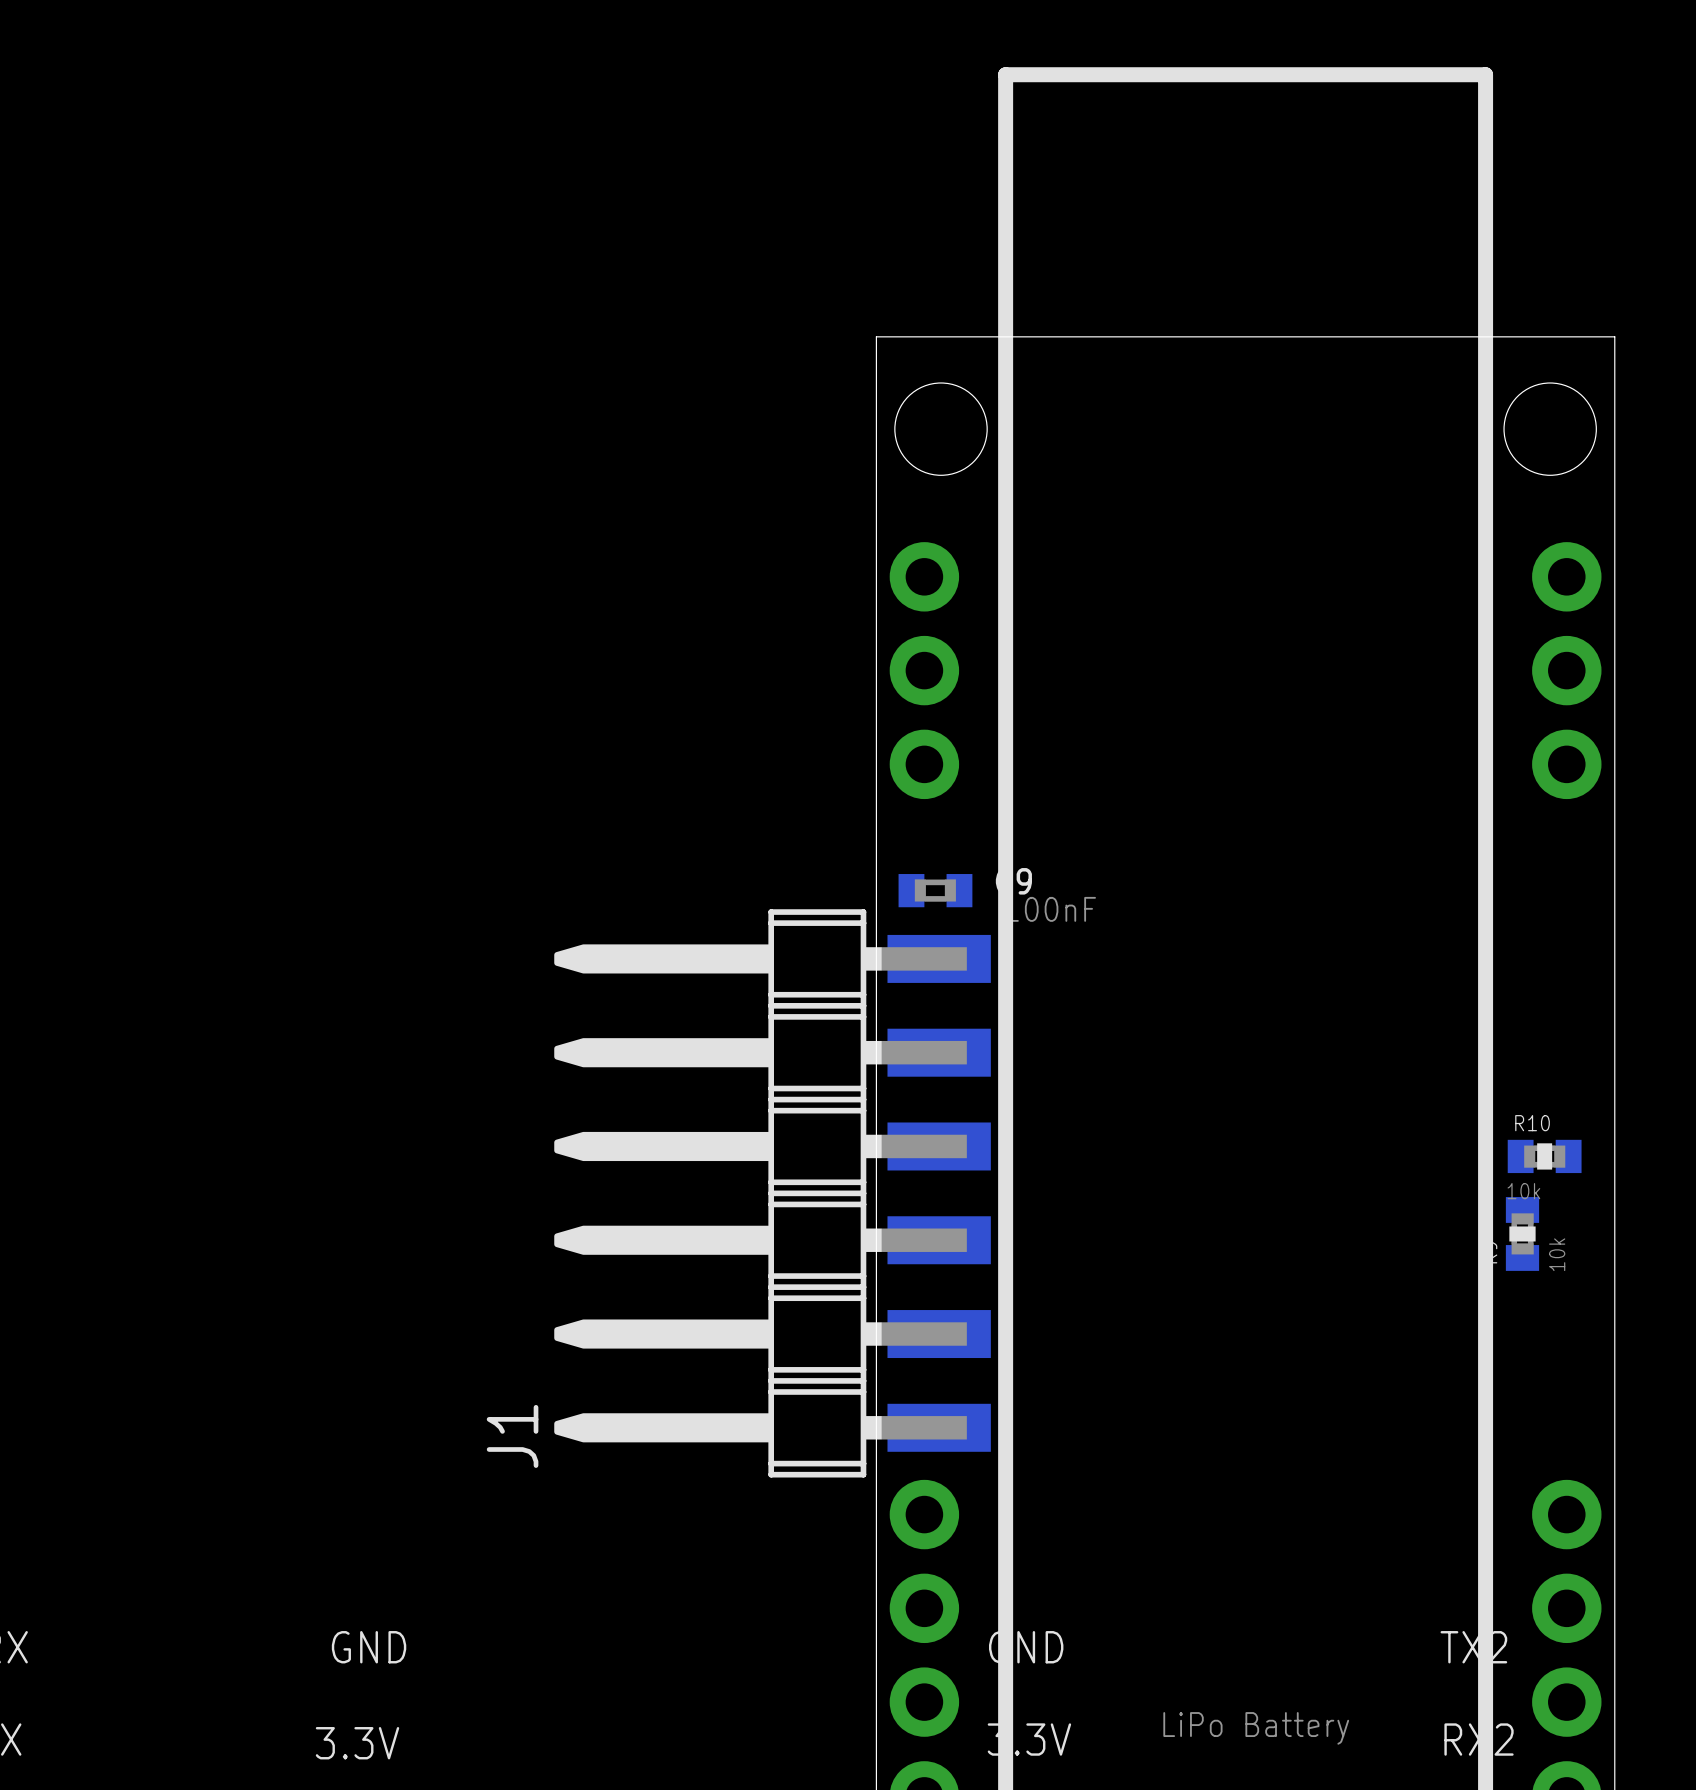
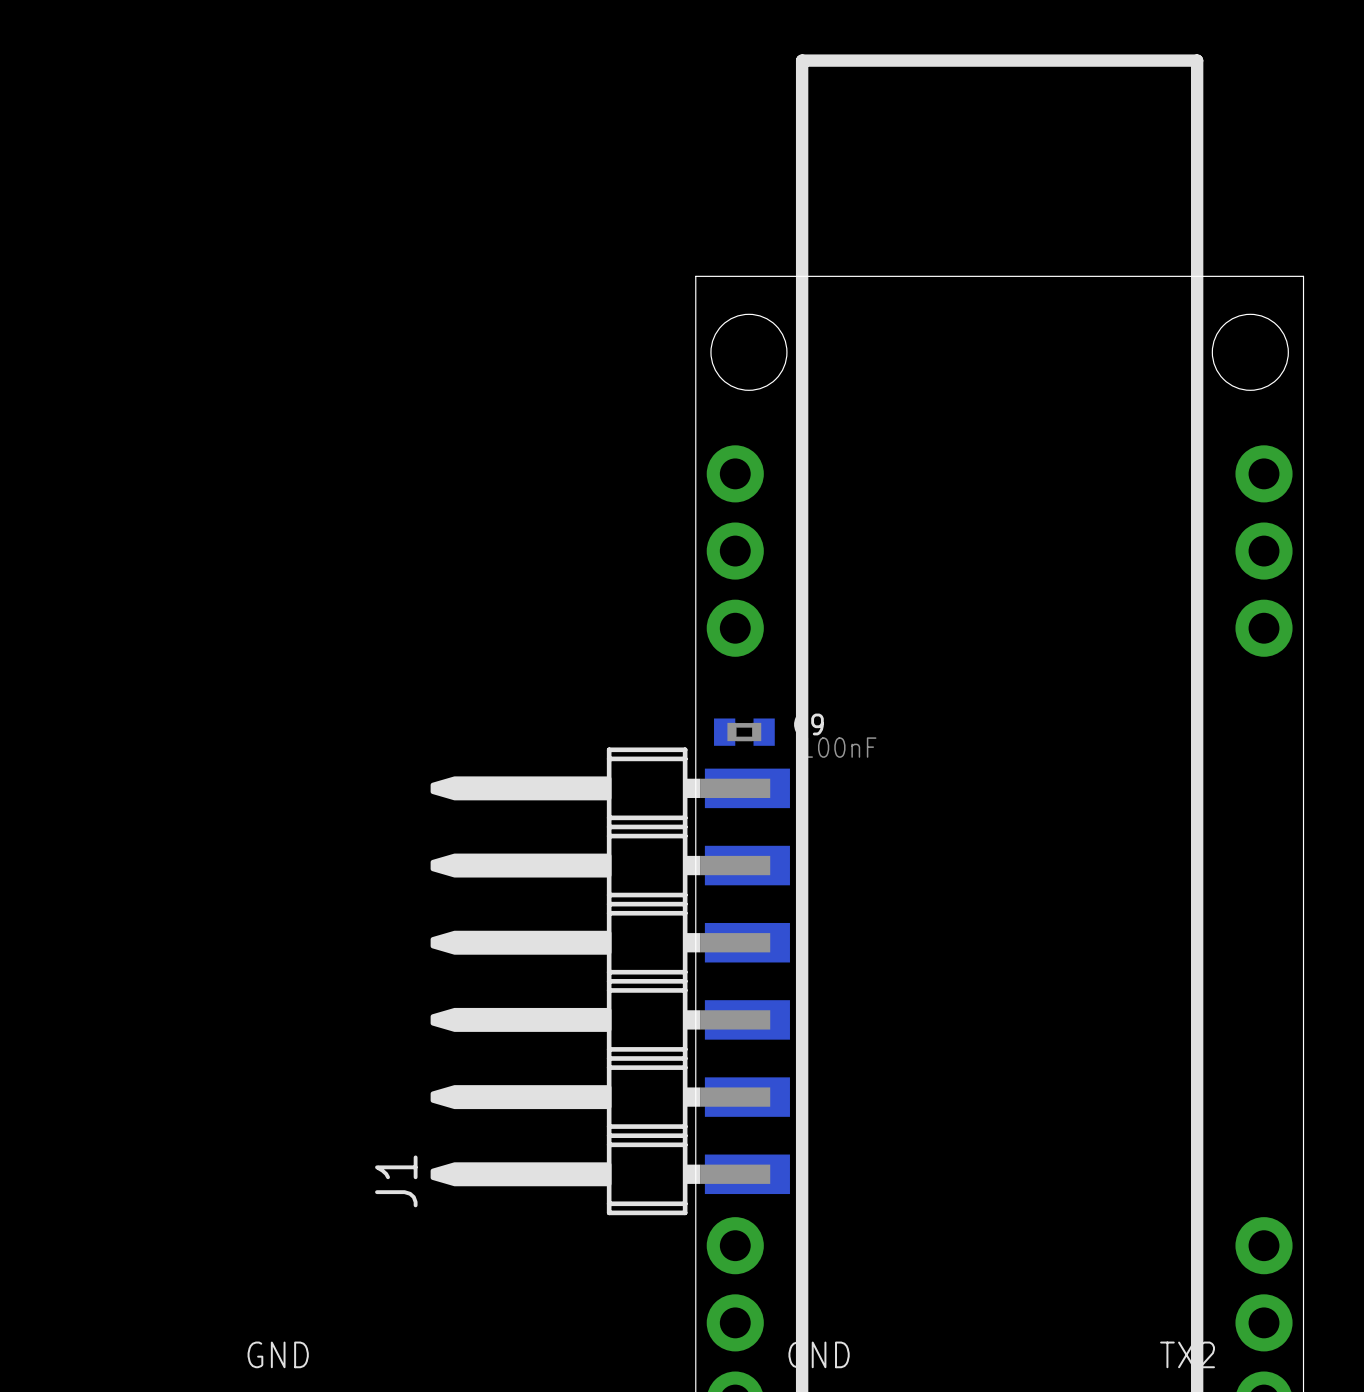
R10: 10k (1544, 1156) -> none
part: 10k (1522, 1233) -> none

